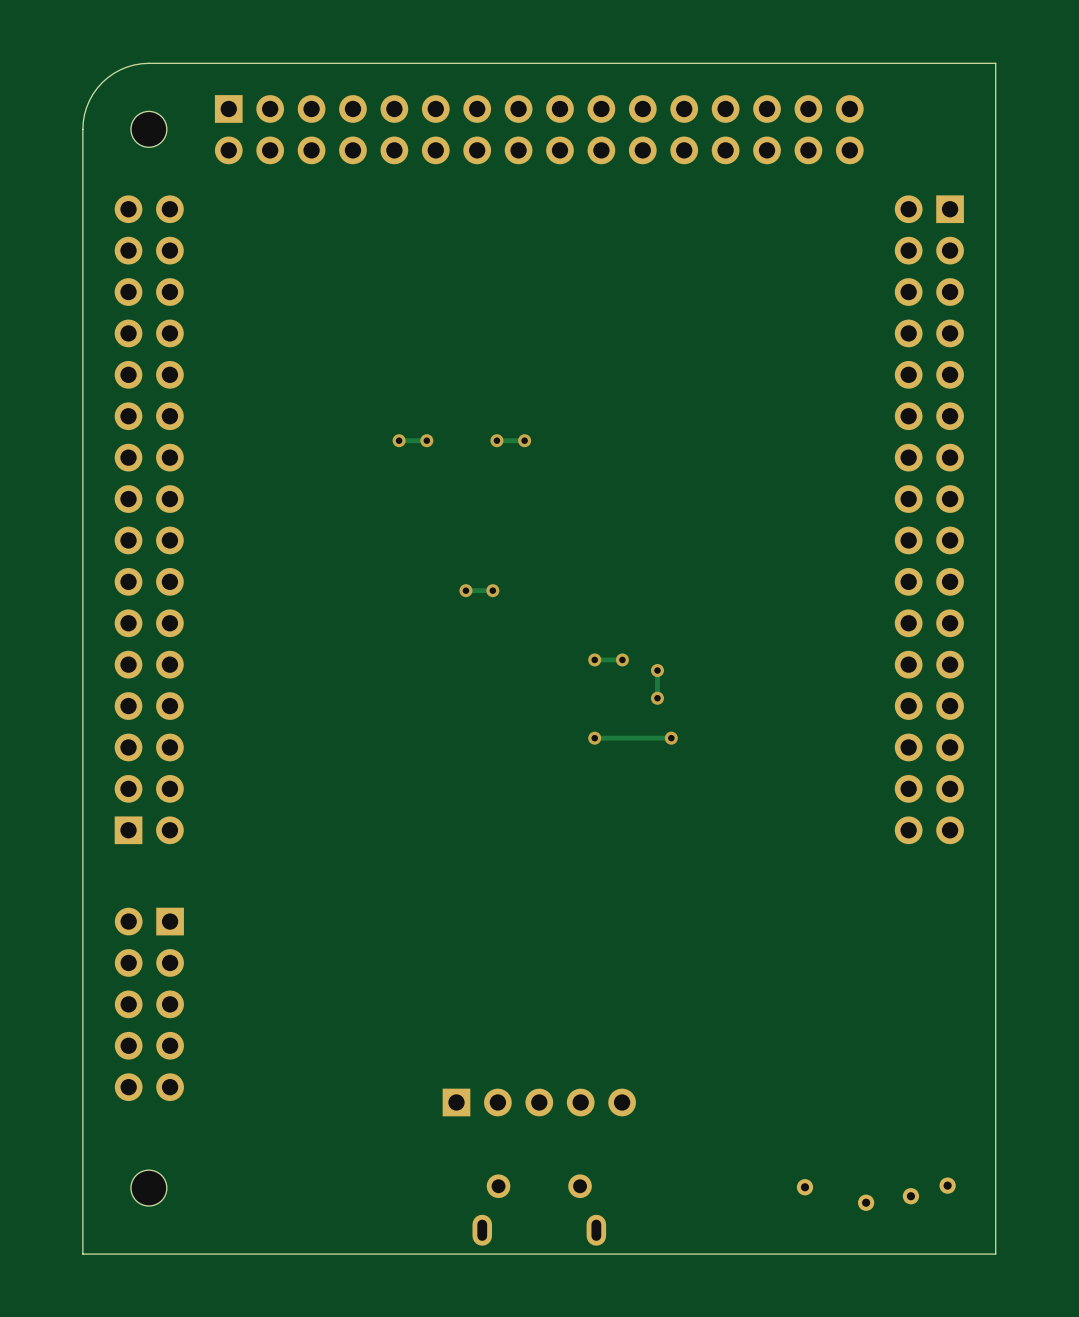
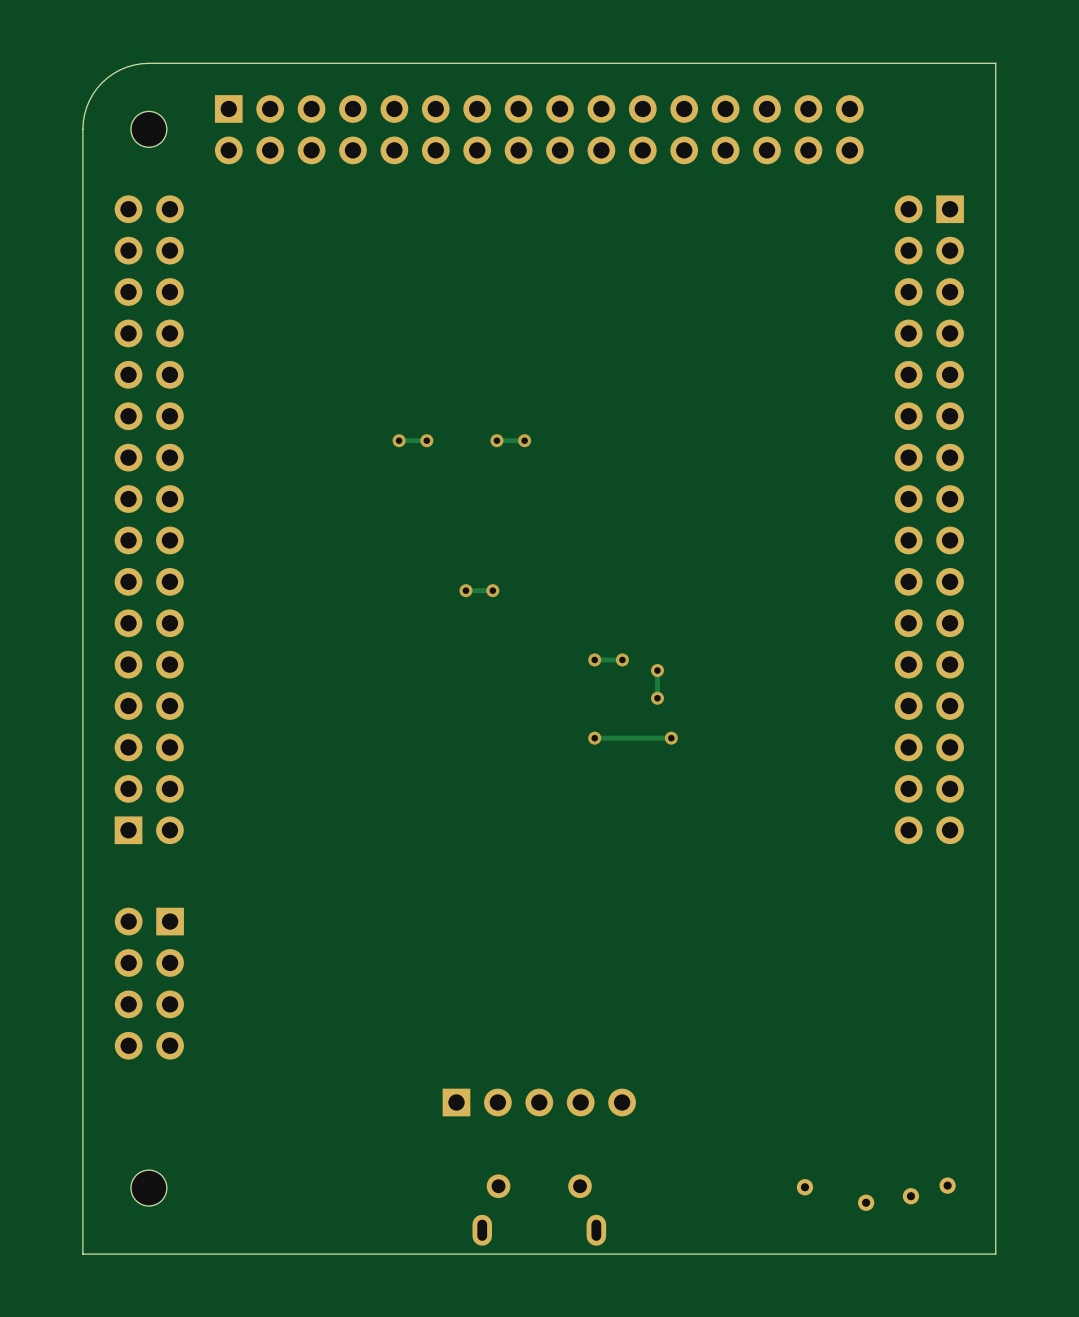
part: (149, 1004) -> none

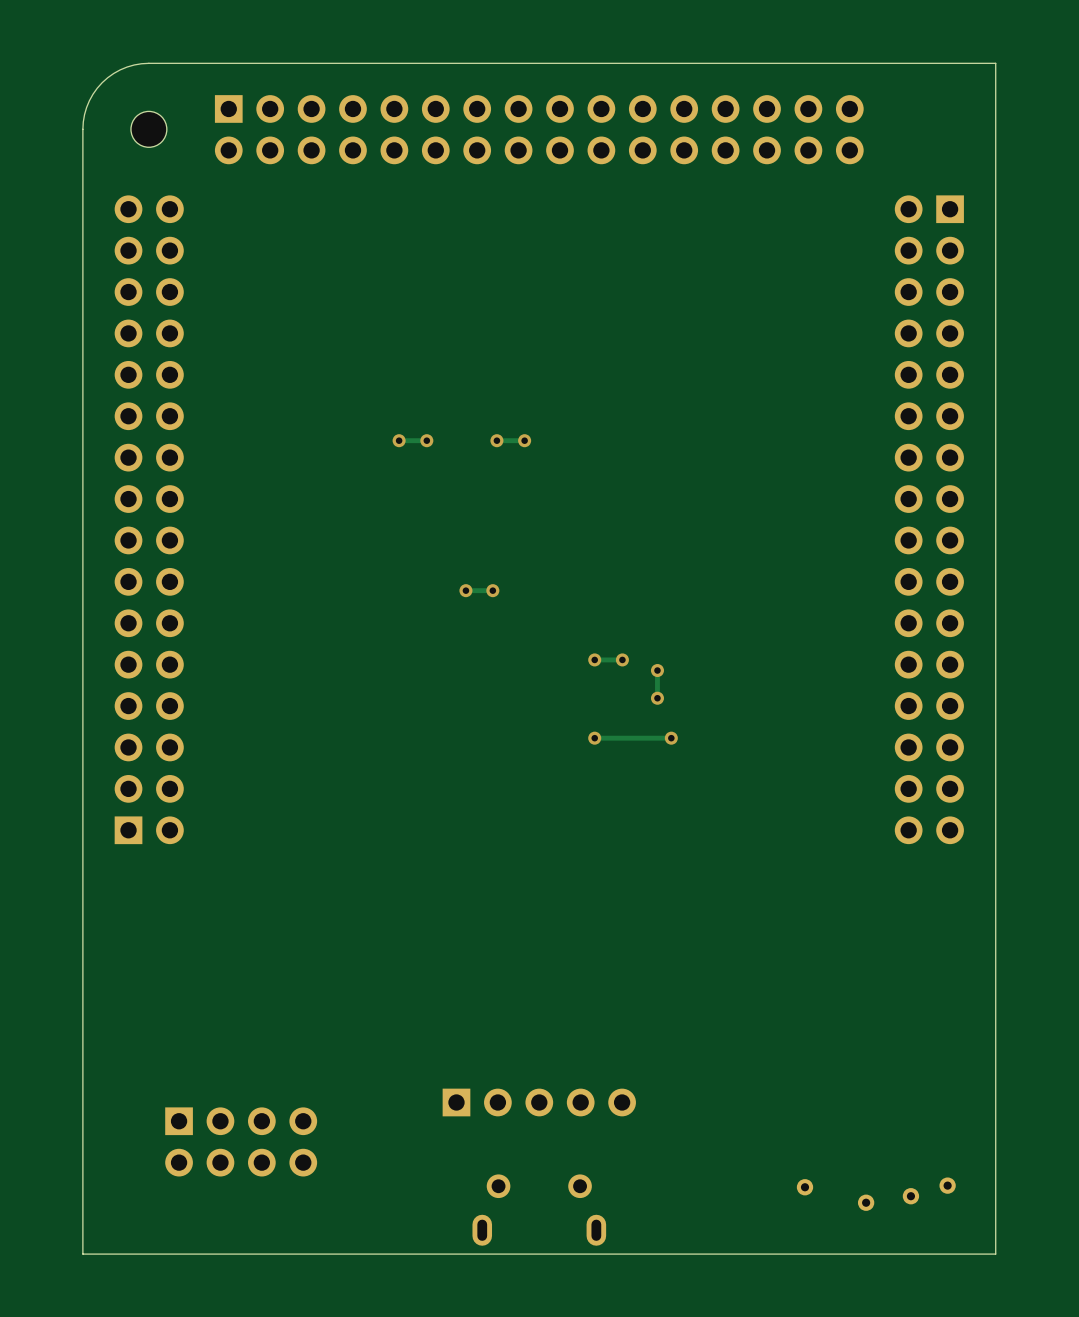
part rotation: 0° (149, 983) -> 90° counterclockwise (241, 1141)
part position: (149, 983) -> (241, 1141)
part: (148, 1188) -> none

